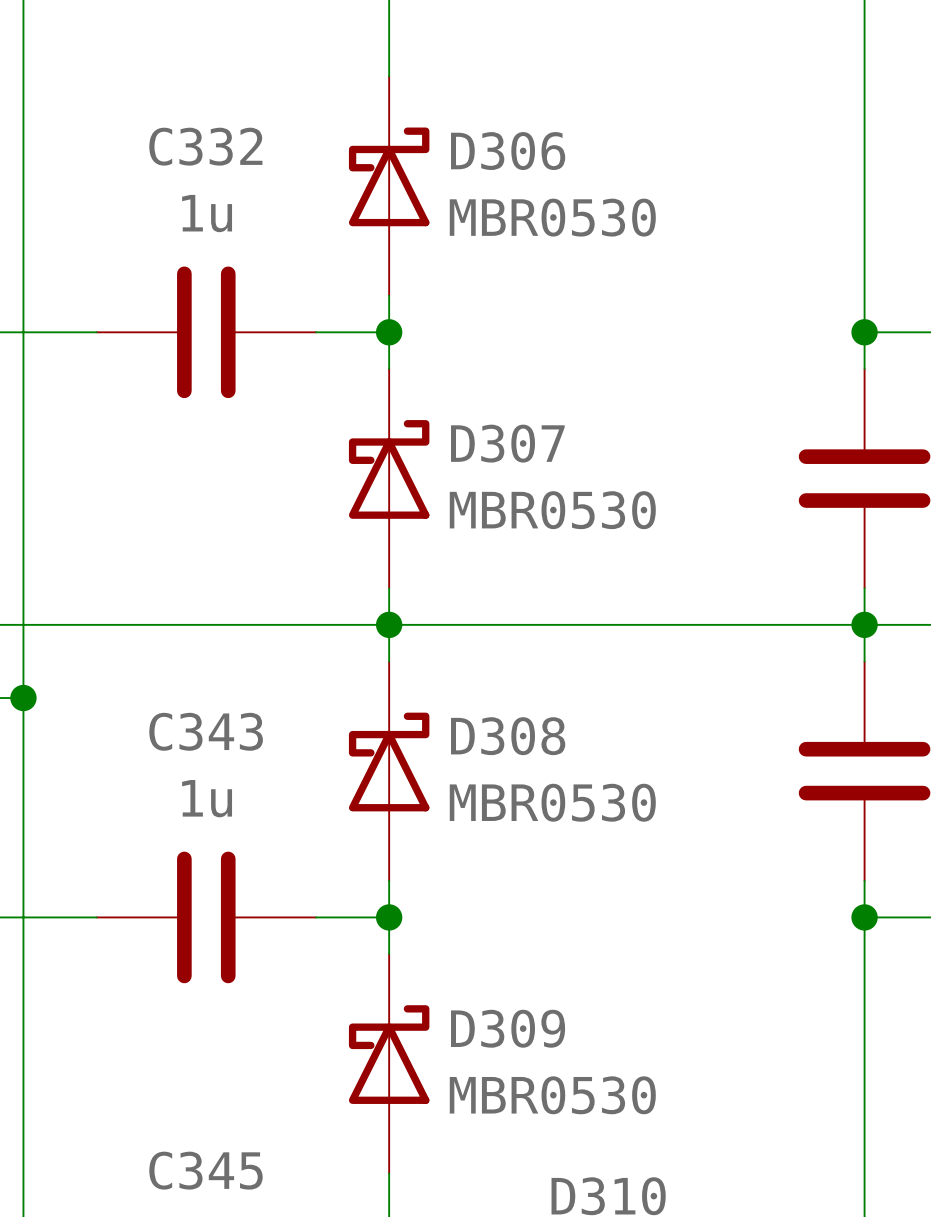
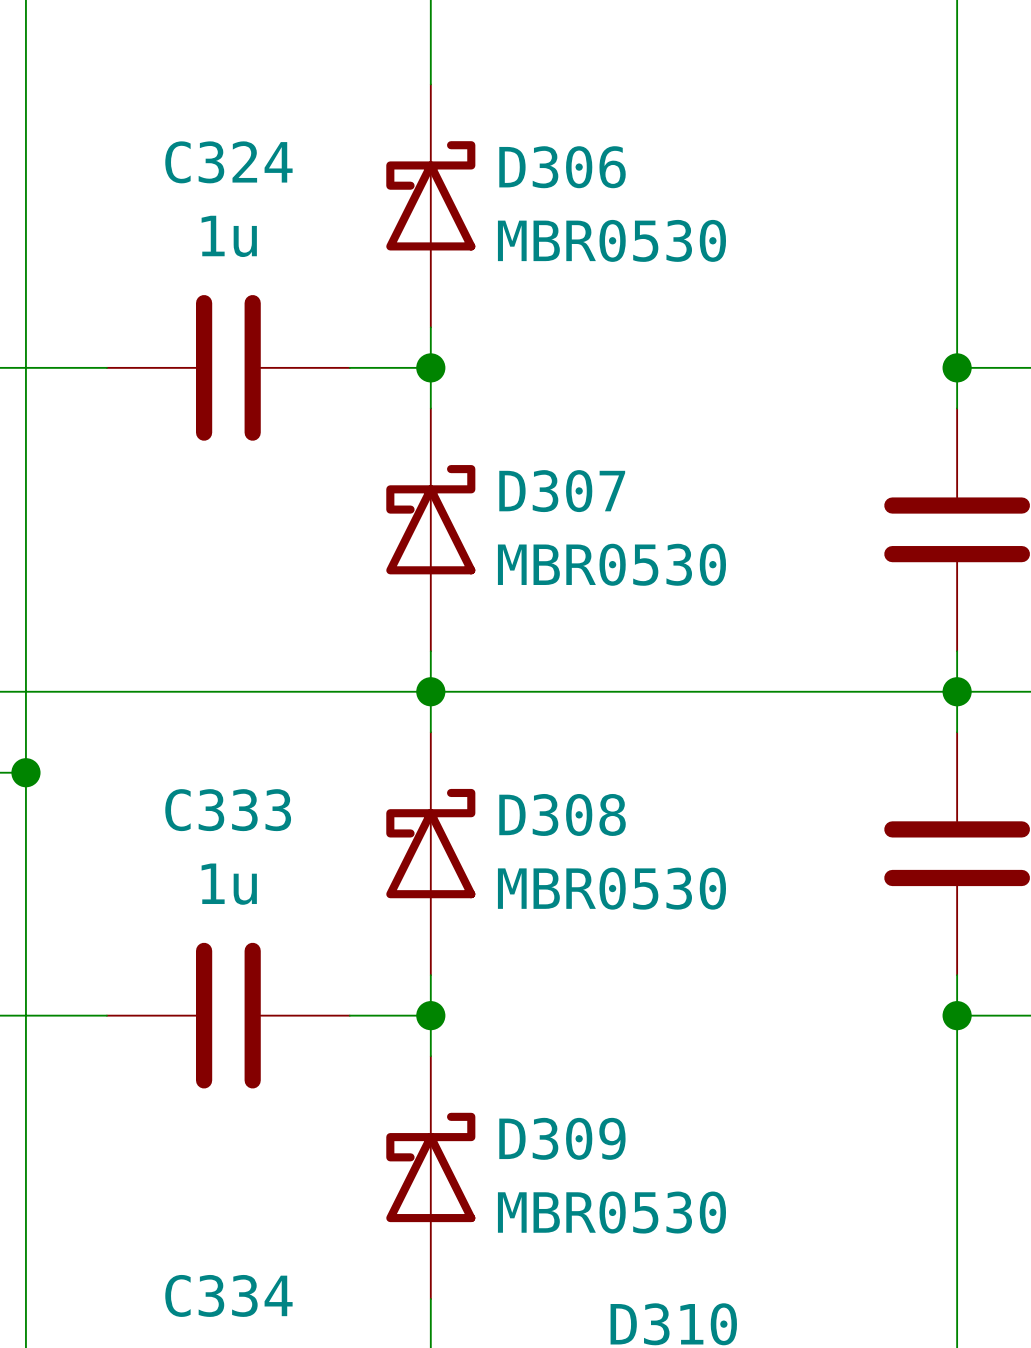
C332 name: C332 (205, 146) -> C324 (228, 162)
C343 name: C343 (206, 731) -> C333 (228, 810)
C345 name: C345 (206, 1170) -> C334 (228, 1295)

